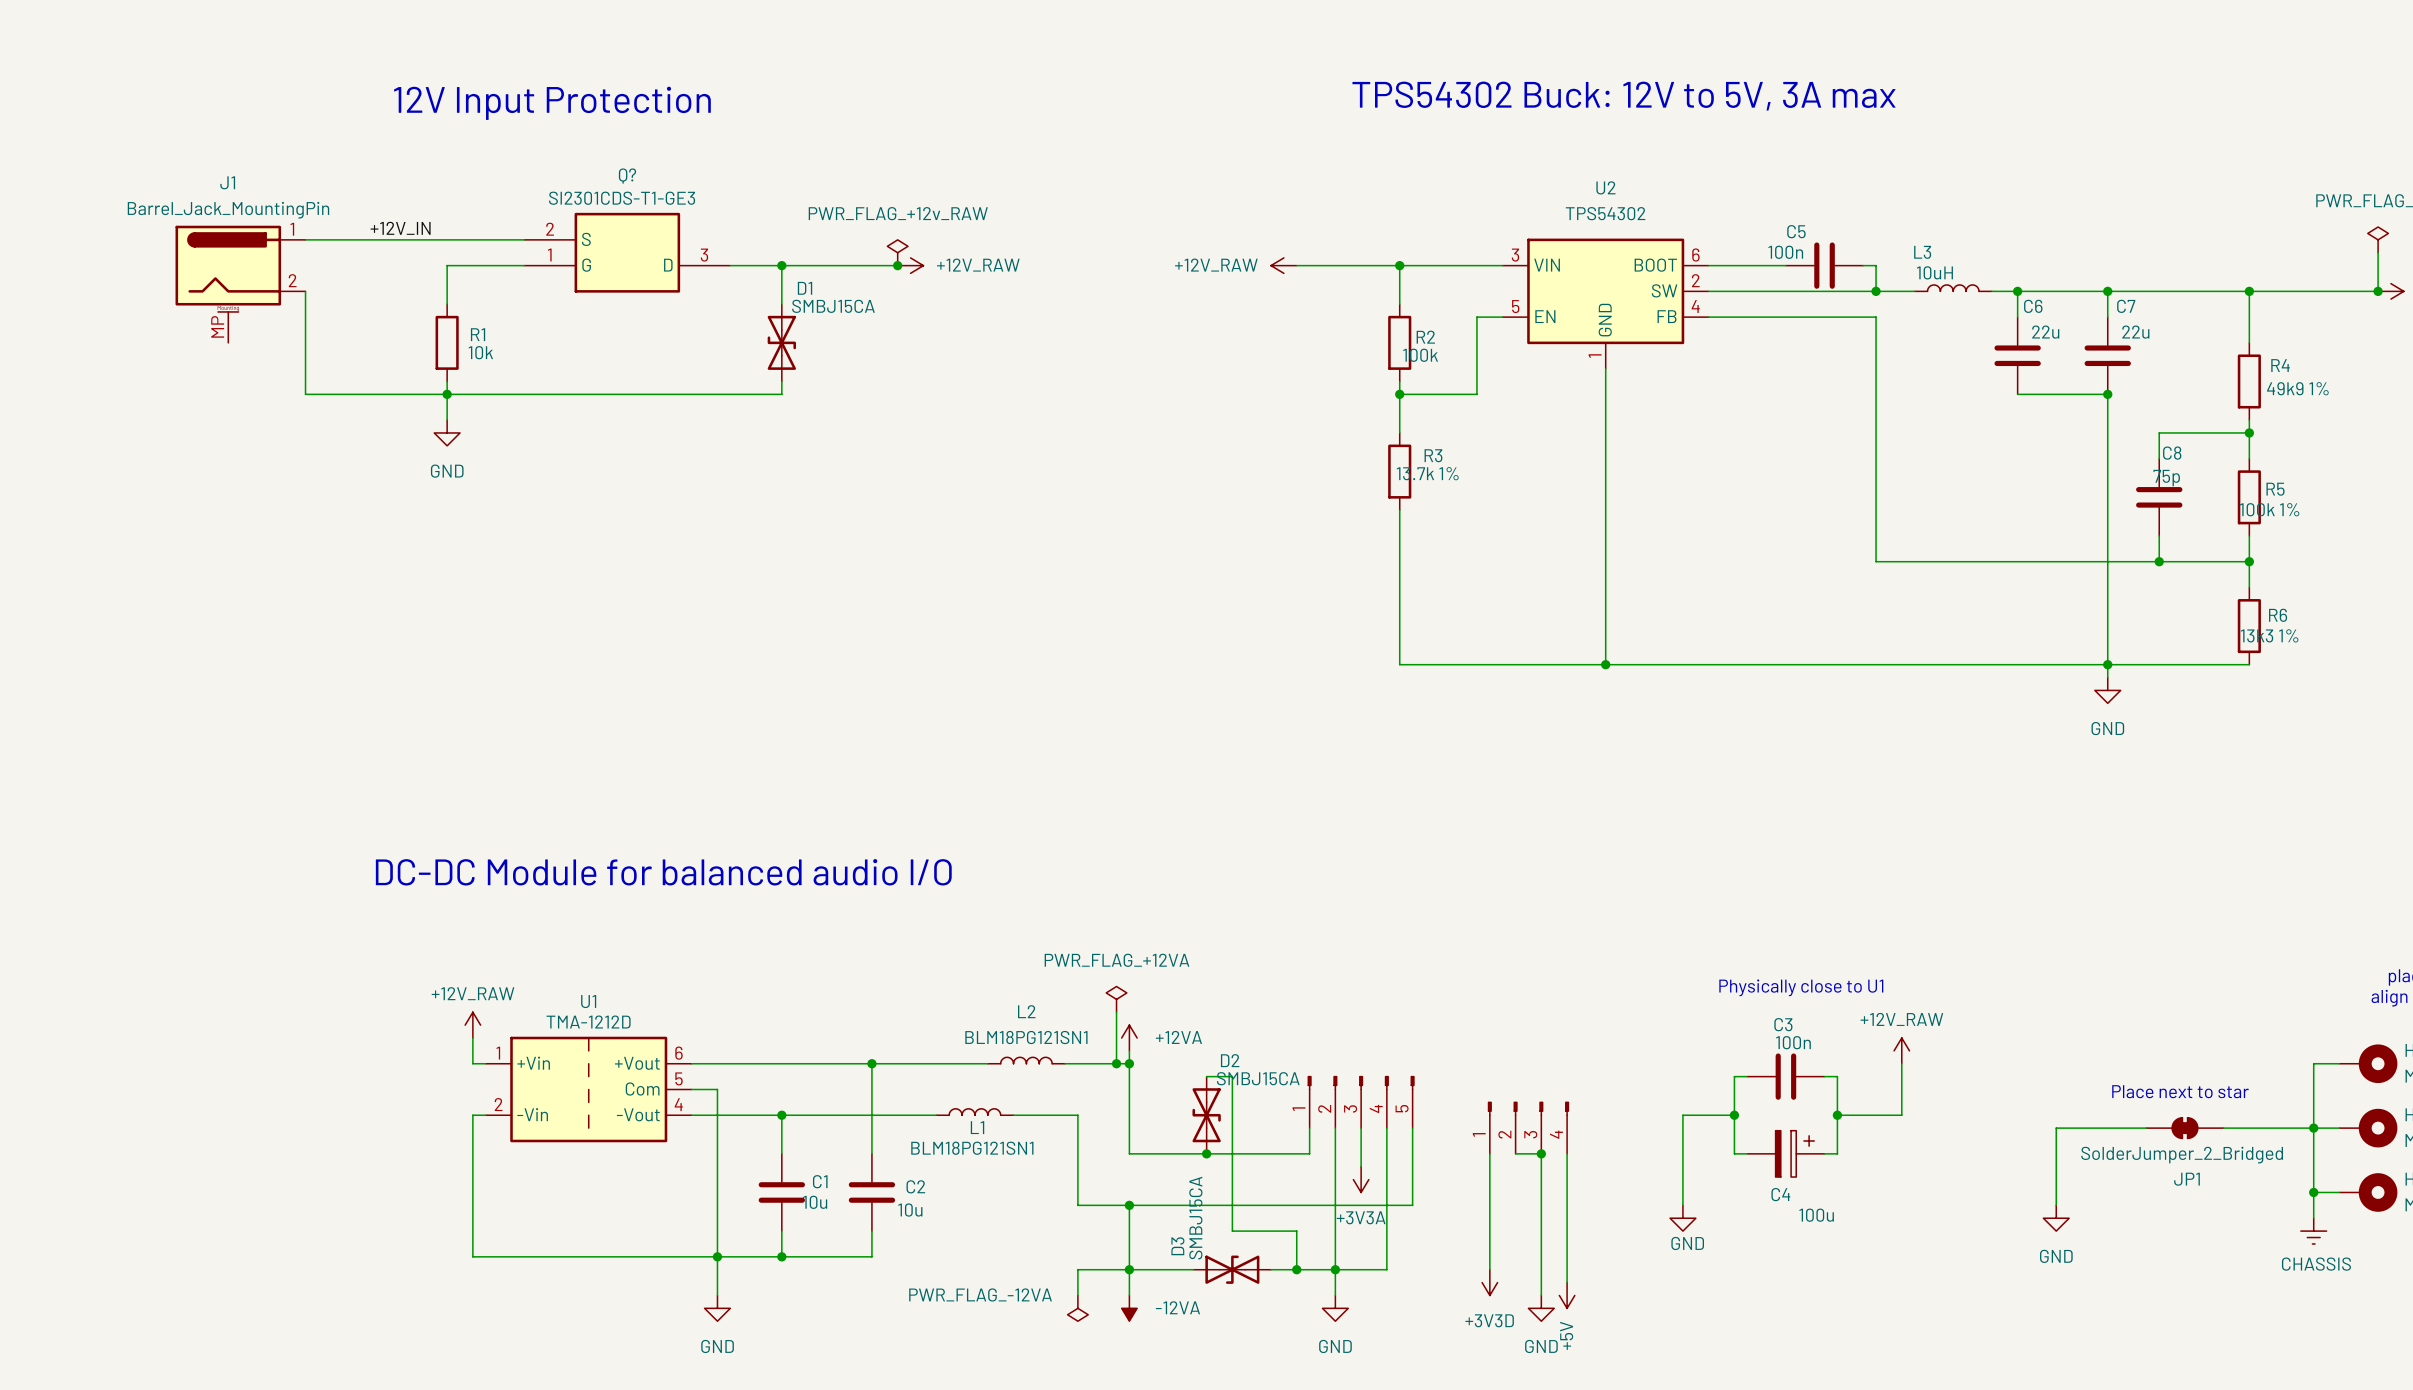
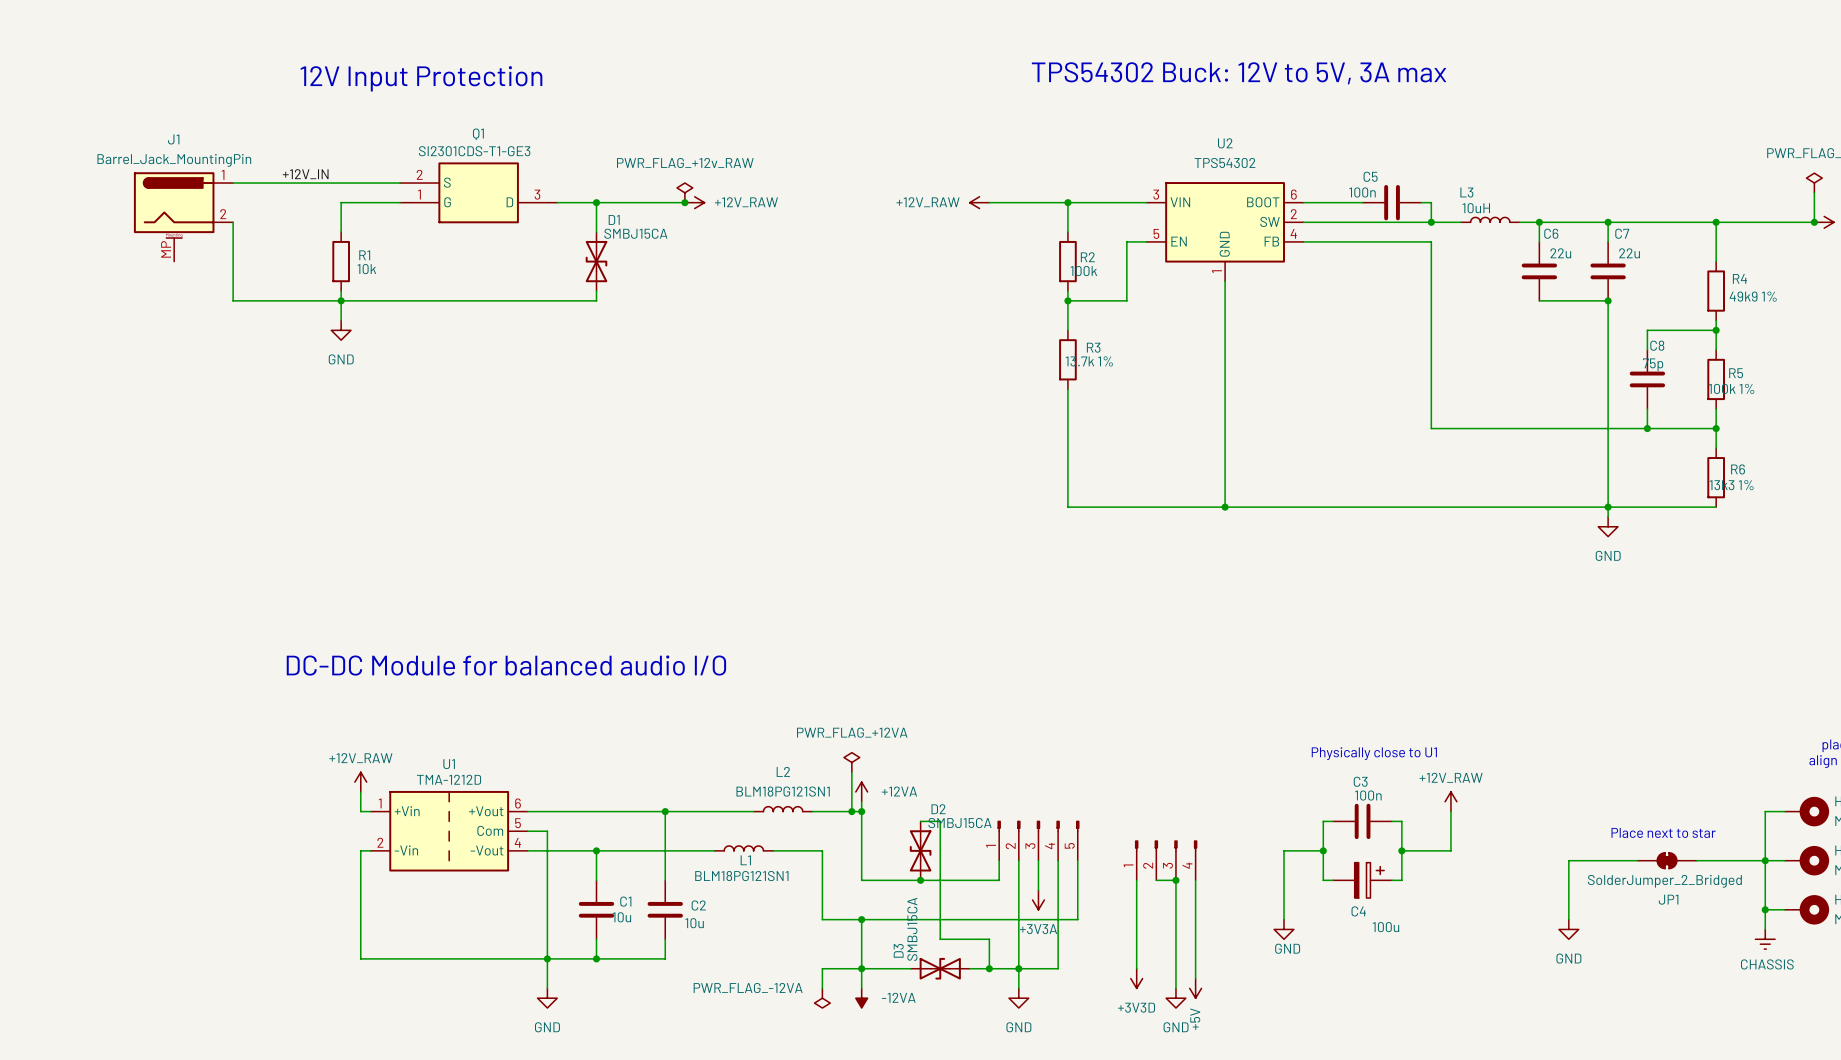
Q? name: Q? (627, 176) -> Q1 (478, 134)

